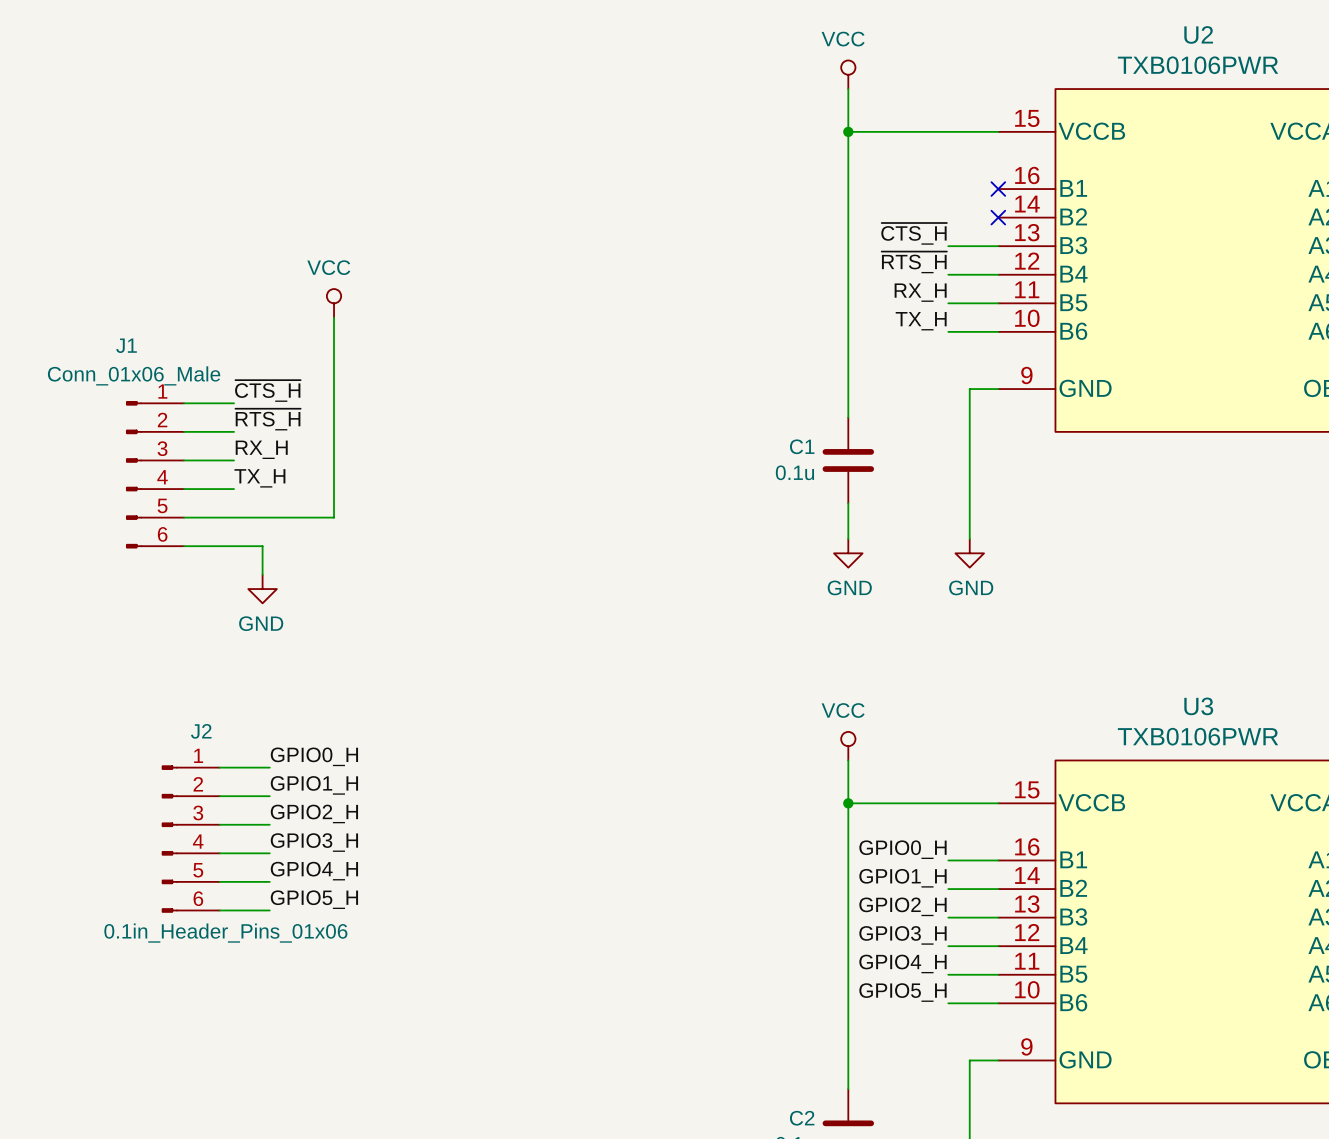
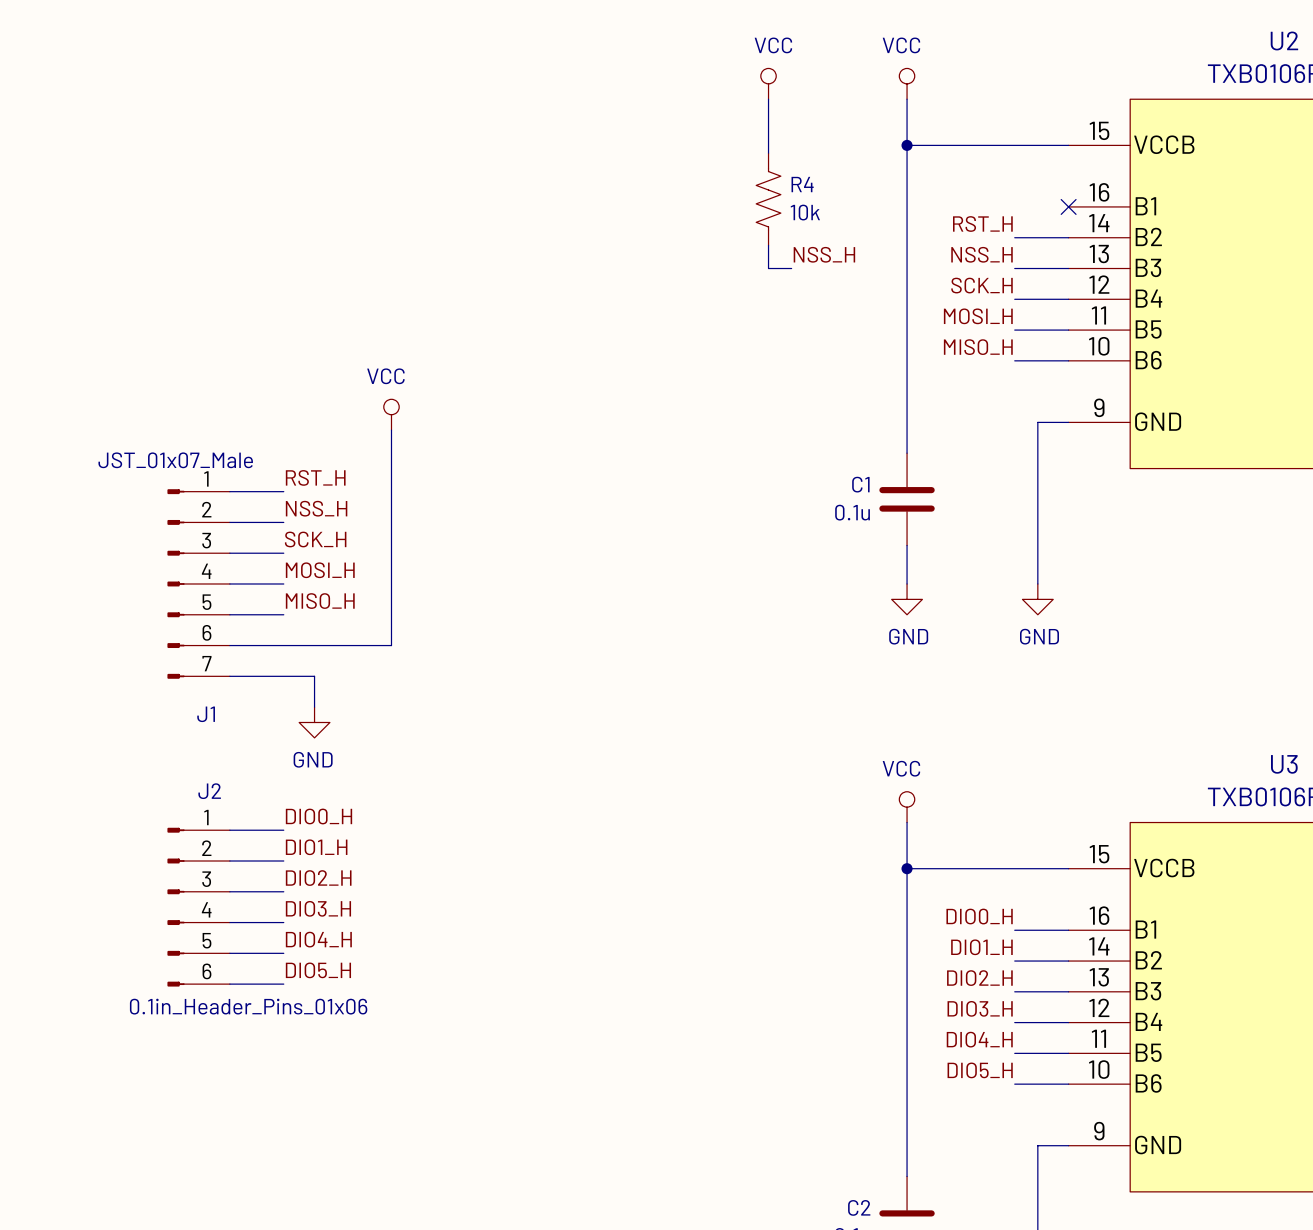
power symbol: none -> VCC (768, 83)
wire: none -> (768, 99) (768, 153)
R4: none -> 10k (768, 199)
label: none -> RST_H (982, 224)
wire: none -> (1014, 237) (1068, 237)
no-connect mark: (998, 217) -> none
wire: none -> (768, 245) (768, 268) (791, 268)
label: ~{CTS_H} (914, 233) -> NSS_H (982, 254)
label: none -> NSS_H (824, 254)
label: ~{RTS_H} (914, 262) -> SCK_H (982, 285)
label: RX_H (920, 292) -> MOSI_H (978, 316)
power symbol position: VCC (334, 303) -> VCC (391, 414)
wire: (334, 317) (334, 517) (184, 517) -> (391, 430) (391, 645) (229, 645)
label: TX_H (921, 321) -> MISO_H (978, 347)
J1 name position: J1 (126, 345) -> J1 (206, 714)
J1 value: Conn_01x06_Male (134, 375) -> JST_01x07_Male (175, 460)
label: ~{CTS_H} (267, 391) -> none
J1 symbol: [126, 401, 185, 549] -> [167, 489, 230, 679]
wire: (184, 403) (234, 403) -> (229, 522) (283, 522)
label: ~{RTS_H} (268, 419) -> none
wire: (184, 431) (234, 431) -> (229, 553) (283, 553)
label: none -> RST_H (315, 477)
label: RX_H (261, 449) -> none
wire: none -> (229, 491) (283, 491)
wire: (184, 460) (234, 460) -> (229, 583) (283, 583)
label: none -> NSS_H (316, 508)
label: TX_H (259, 478) -> none
wire: (184, 489) (234, 489) -> (229, 614) (283, 614)
label: none -> SCK_H (315, 539)
label: none -> MOSI_H (320, 570)
wire: (184, 546) (262, 546) (262, 574) -> (229, 676) (314, 676) (314, 707)
label: none -> MISO_H (320, 601)
power symbol position: GND (262, 589) -> GND (314, 722)
label: GPIO0_H (314, 756) -> DIO0_H (318, 816)
label: GPIO1_H (314, 785) -> DIO1_H (316, 847)
label: GPIO2_H (314, 813) -> DIO2_H (318, 878)
label: GPIO3_H (314, 842) -> DIO3_H (318, 908)
label: GPIO0_H (902, 849) -> DIO0_H (979, 916)
label: GPIO4_H (314, 871) -> DIO4_H (318, 939)
label: GPIO1_H (902, 878) -> DIO1_H (981, 947)
label: GPIO5_H (314, 899) -> DIO5_H (318, 970)
label: GPIO2_H (902, 906) -> DIO2_H (979, 978)
label: GPIO3_H (902, 935) -> DIO3_H (980, 1008)
label: GPIO4_H (902, 963) -> DIO4_H (979, 1039)
label: GPIO5_H (902, 992) -> DIO5_H (980, 1070)

